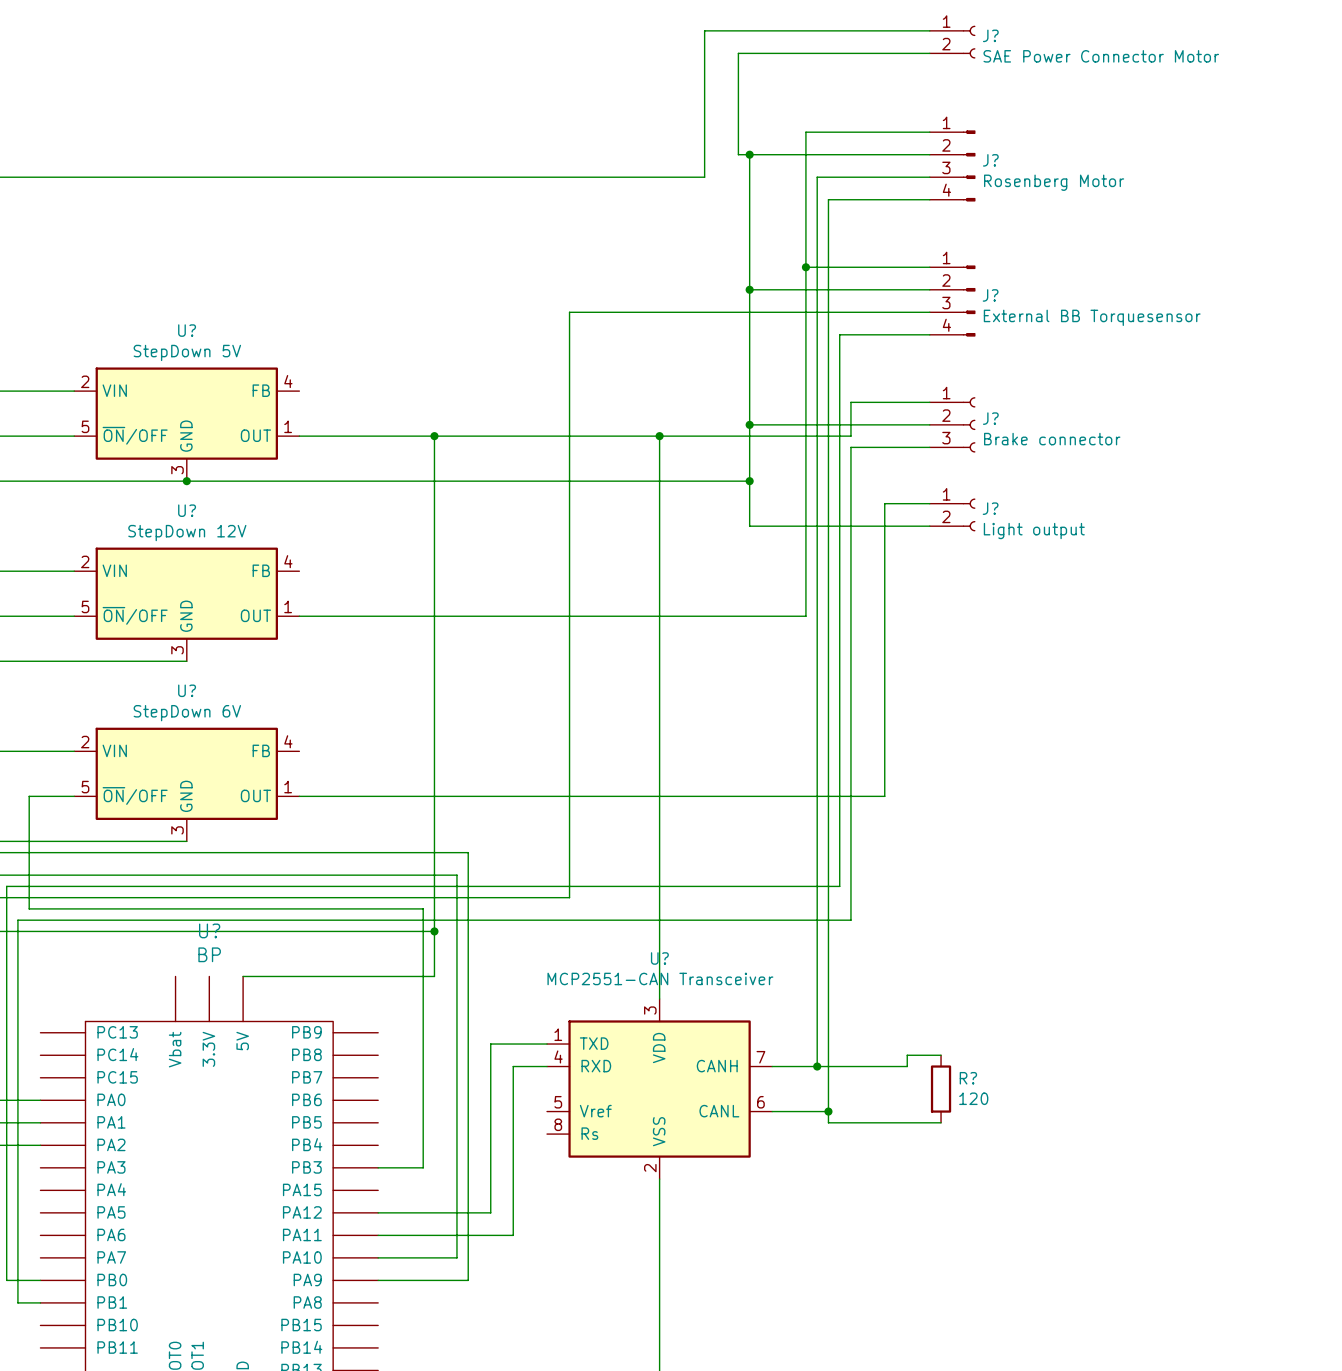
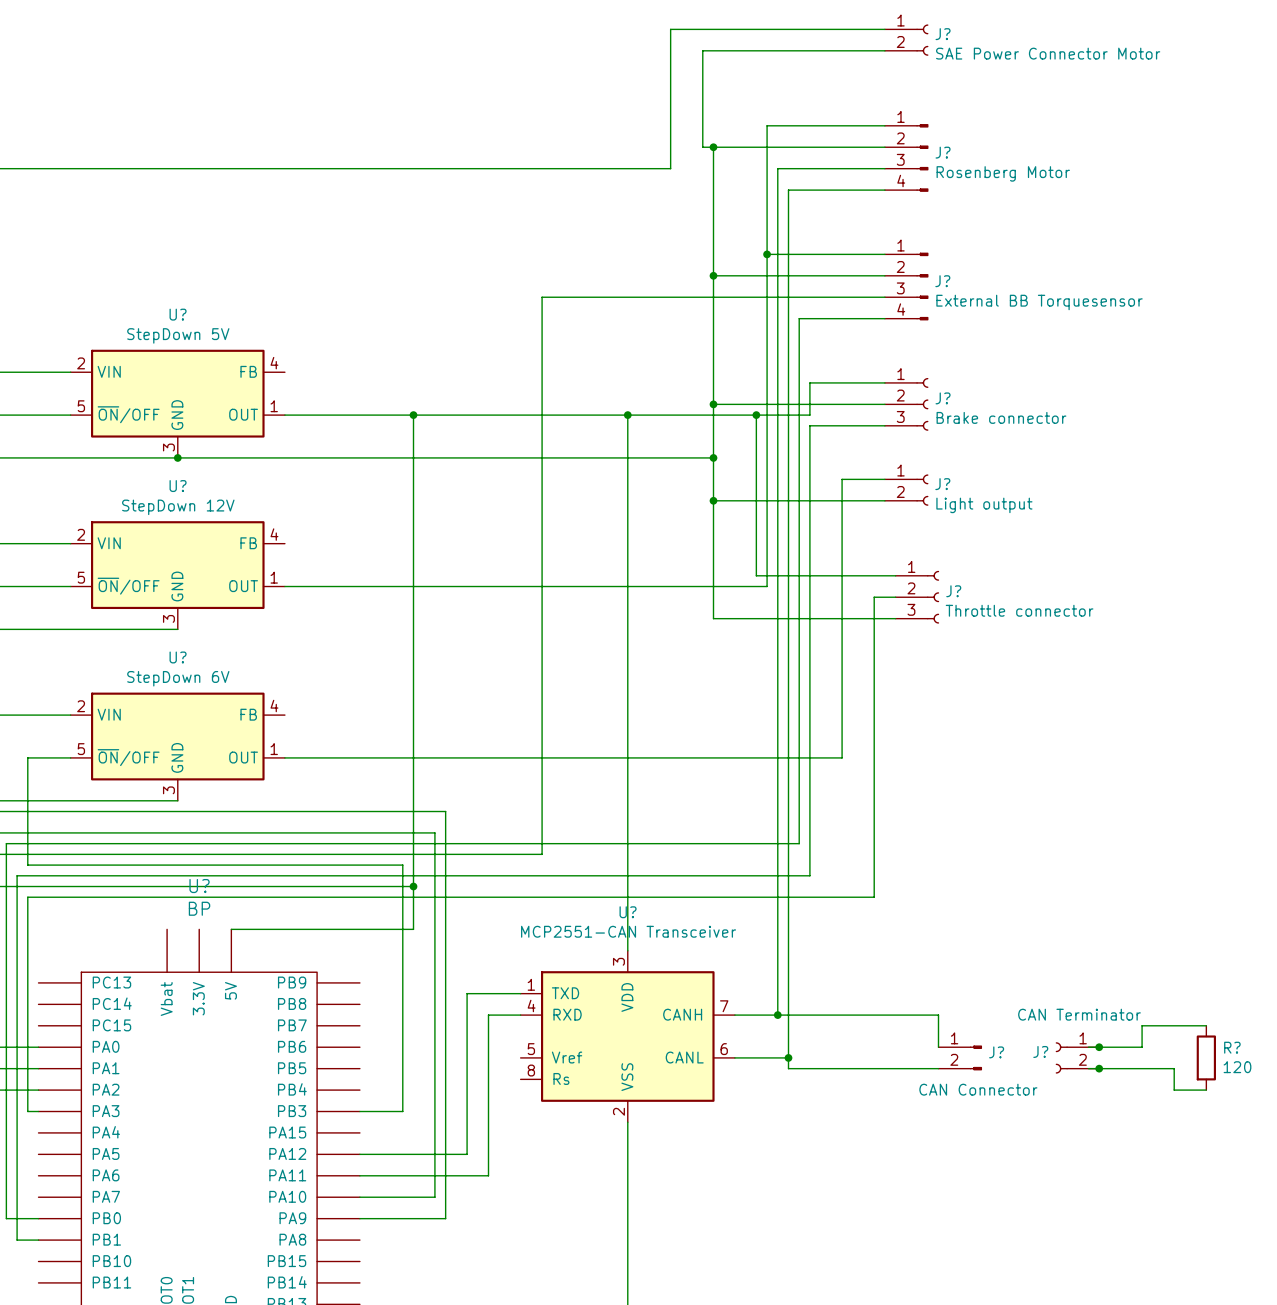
wire: none -> (756, 415) (756, 575) (895, 575)
junction: none -> (756, 415)
wire: none -> (713, 500) (713, 618) (895, 618)
junction: none -> (713, 500)
wire: none -> (895, 597) (874, 597) (874, 897) (27, 897) (27, 1111) (38, 1111)
J?: none -> Throttle connector (917, 597)
wire: (941, 1055) (907, 1055) (907, 1066) -> (938, 1047) (938, 1015) (863, 1015)
wire: none -> (1206, 1025) (1142, 1025) (1142, 1047) (1088, 1047)
R?: 120 (941, 1089) -> none
junction: none -> (1099, 1047)
J?: none -> CAN Connector (960, 1057)
J?: none -> CAN Terminator (1077, 1057)
R?: none -> 120 (1206, 1057)
wire: none -> (895, 1068) (938, 1068)
wire: none -> (1088, 1068) (1174, 1068) (1174, 1090) (1206, 1090)
junction: none -> (1099, 1068)

